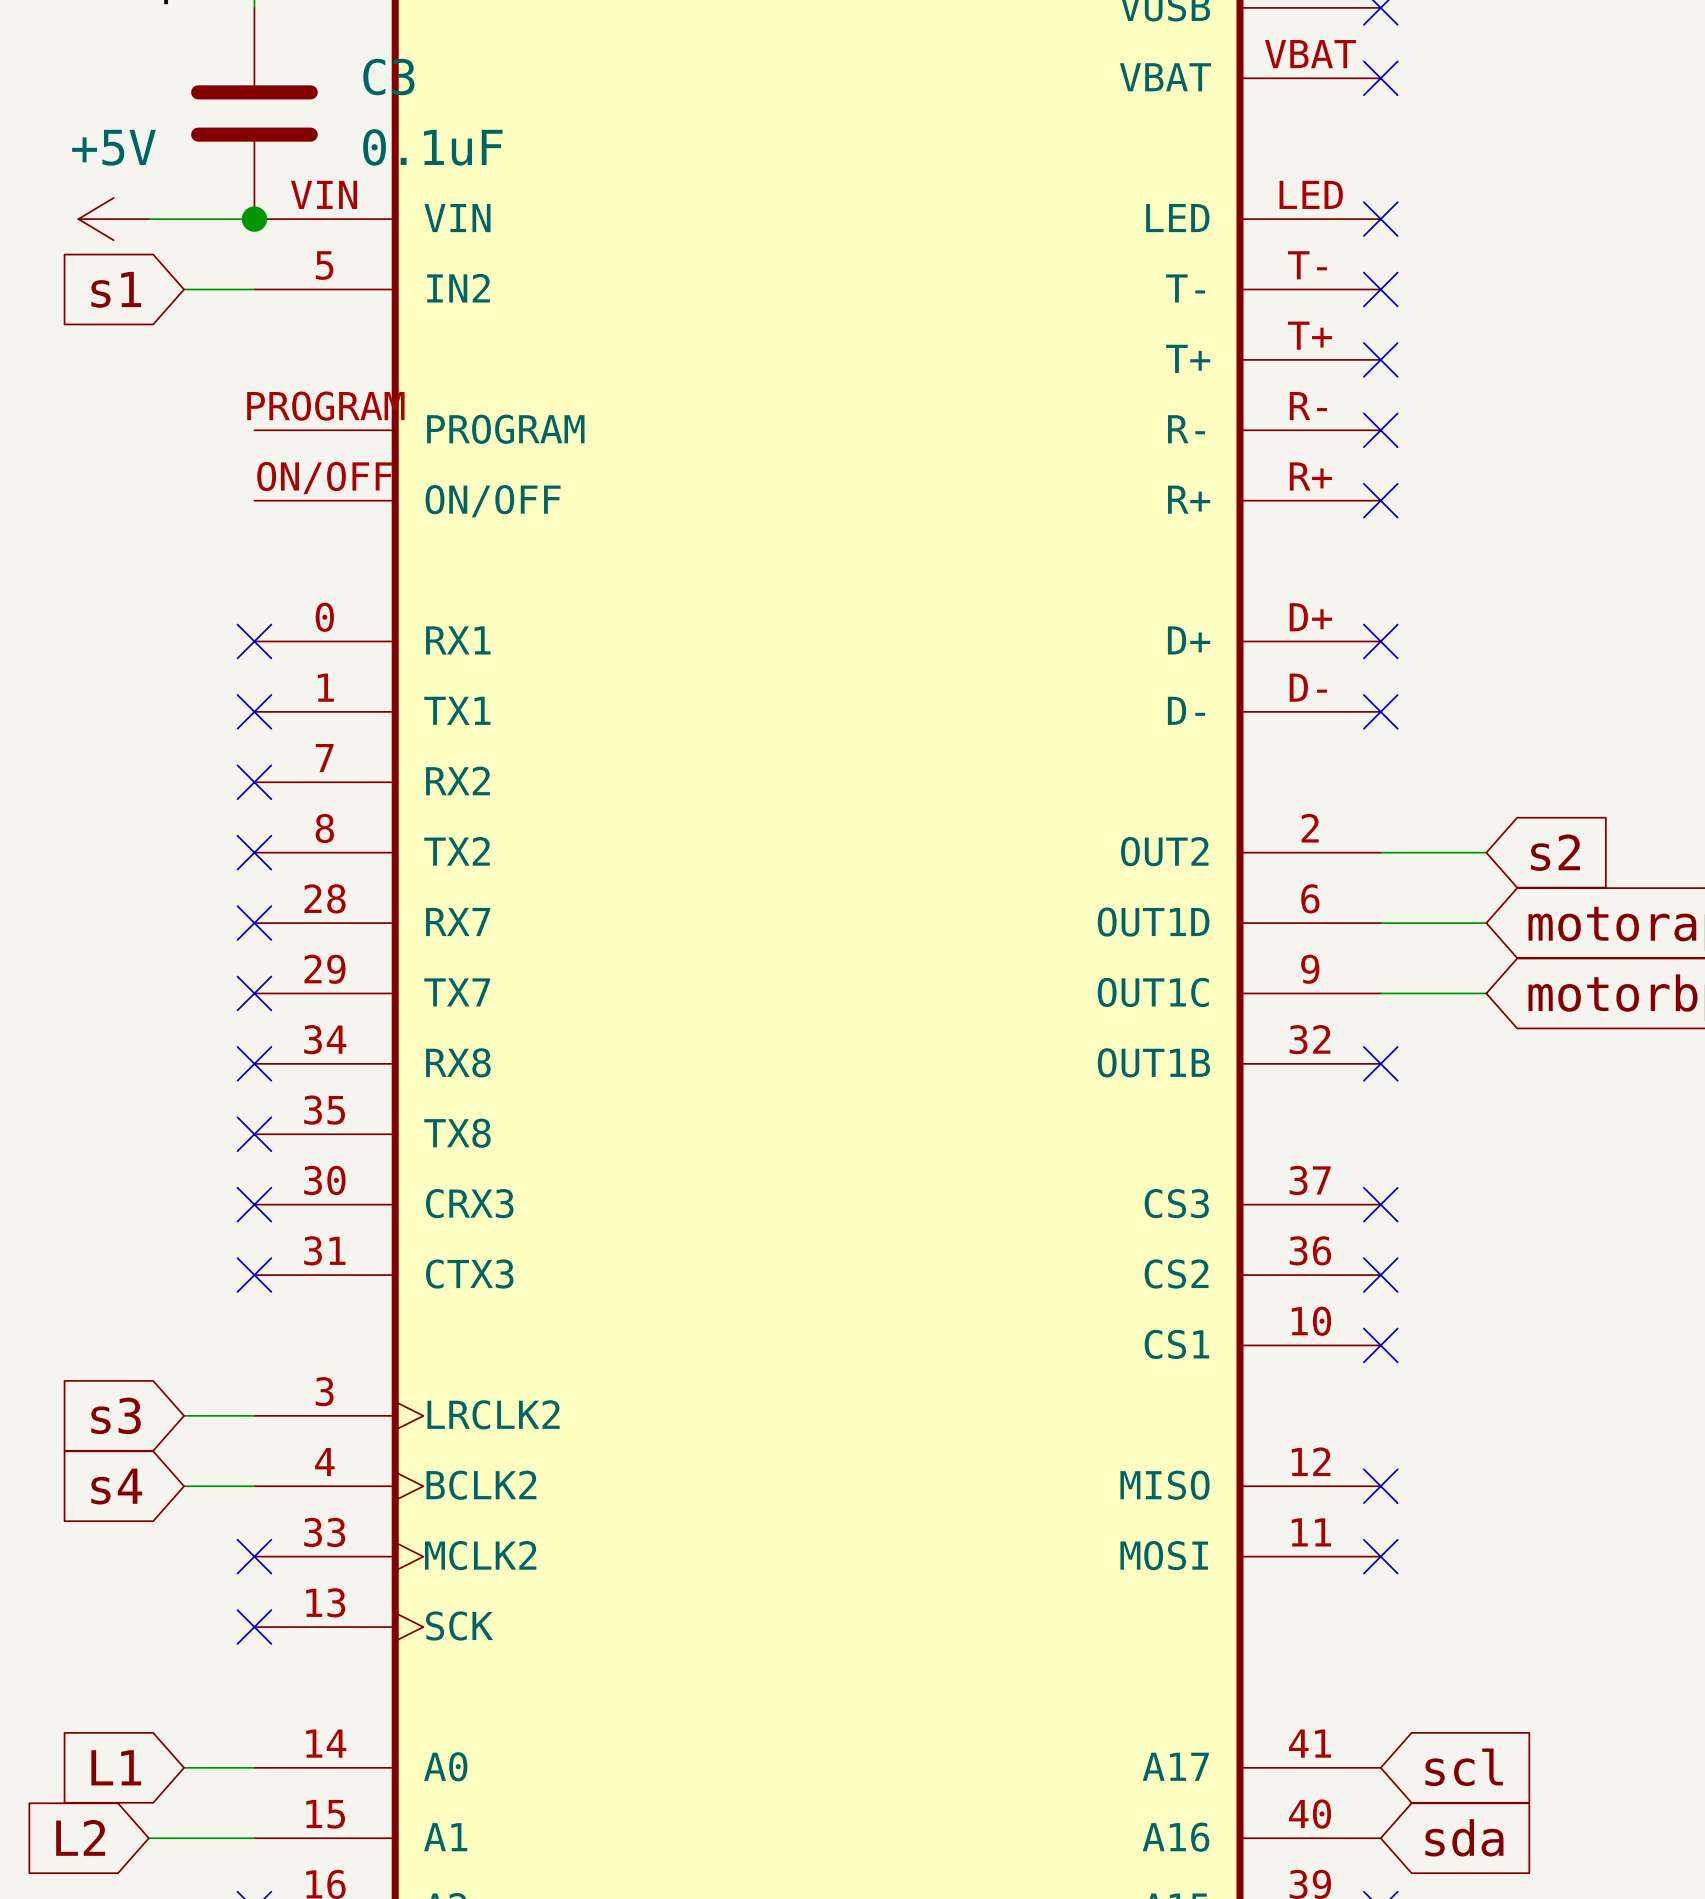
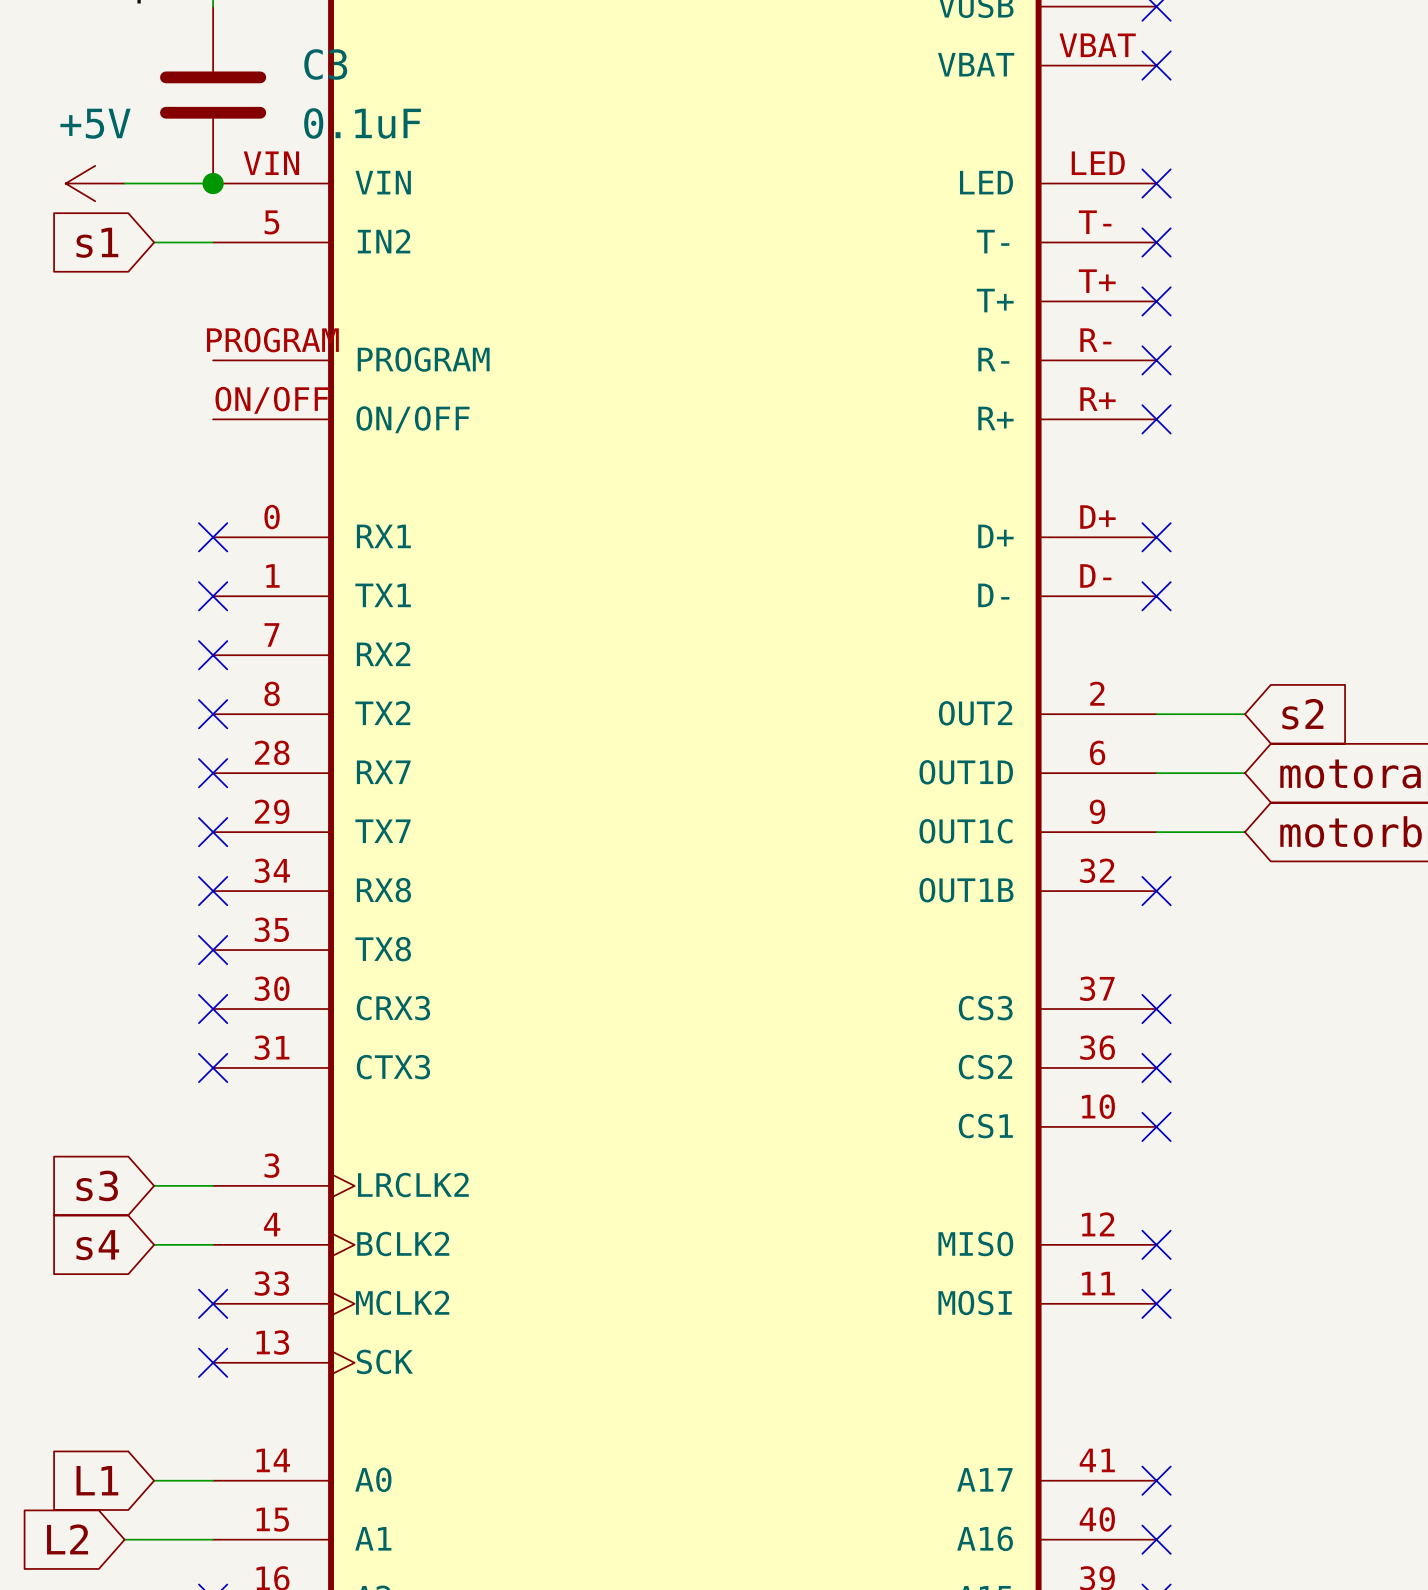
no-connect mark: none -> (1156, 1480)
global label: scl (1464, 1767) -> none
global label: sda (1464, 1837) -> none
no-connect mark: none -> (1156, 1539)

